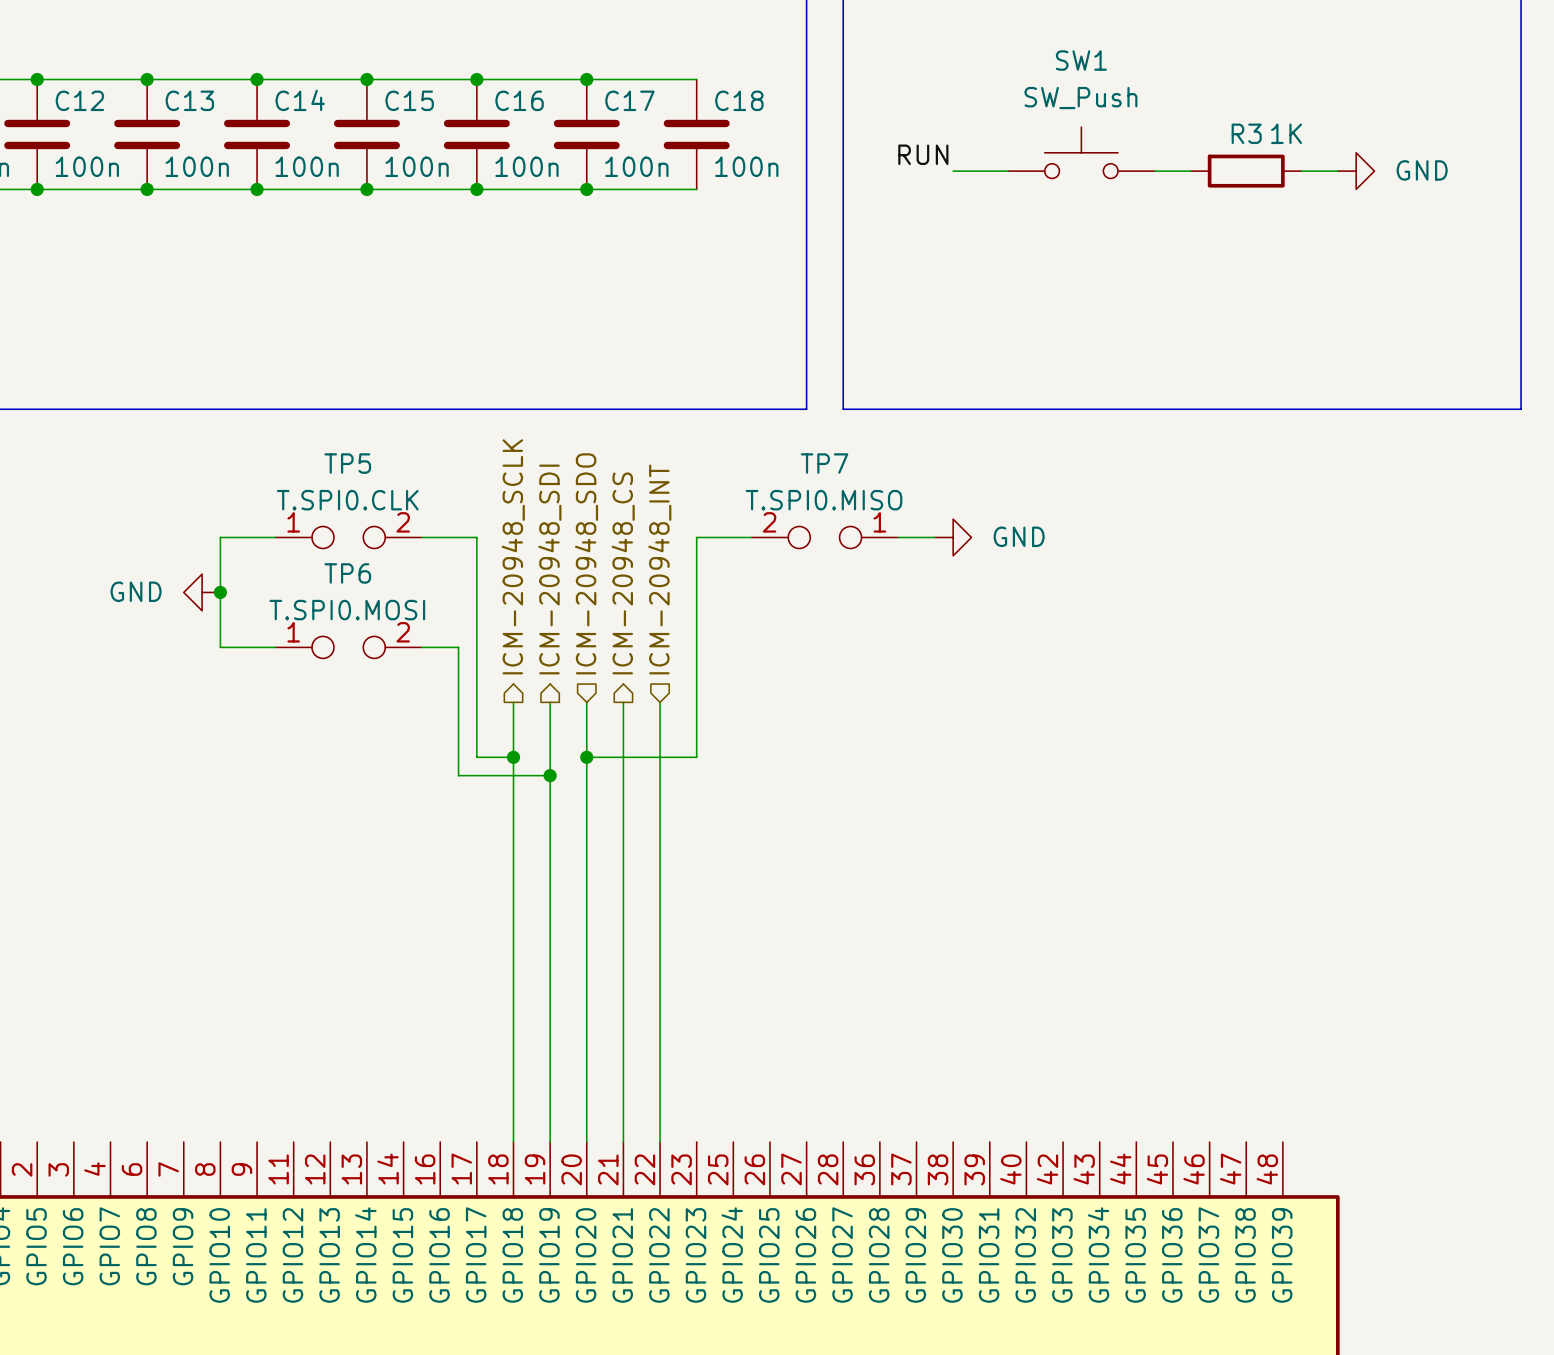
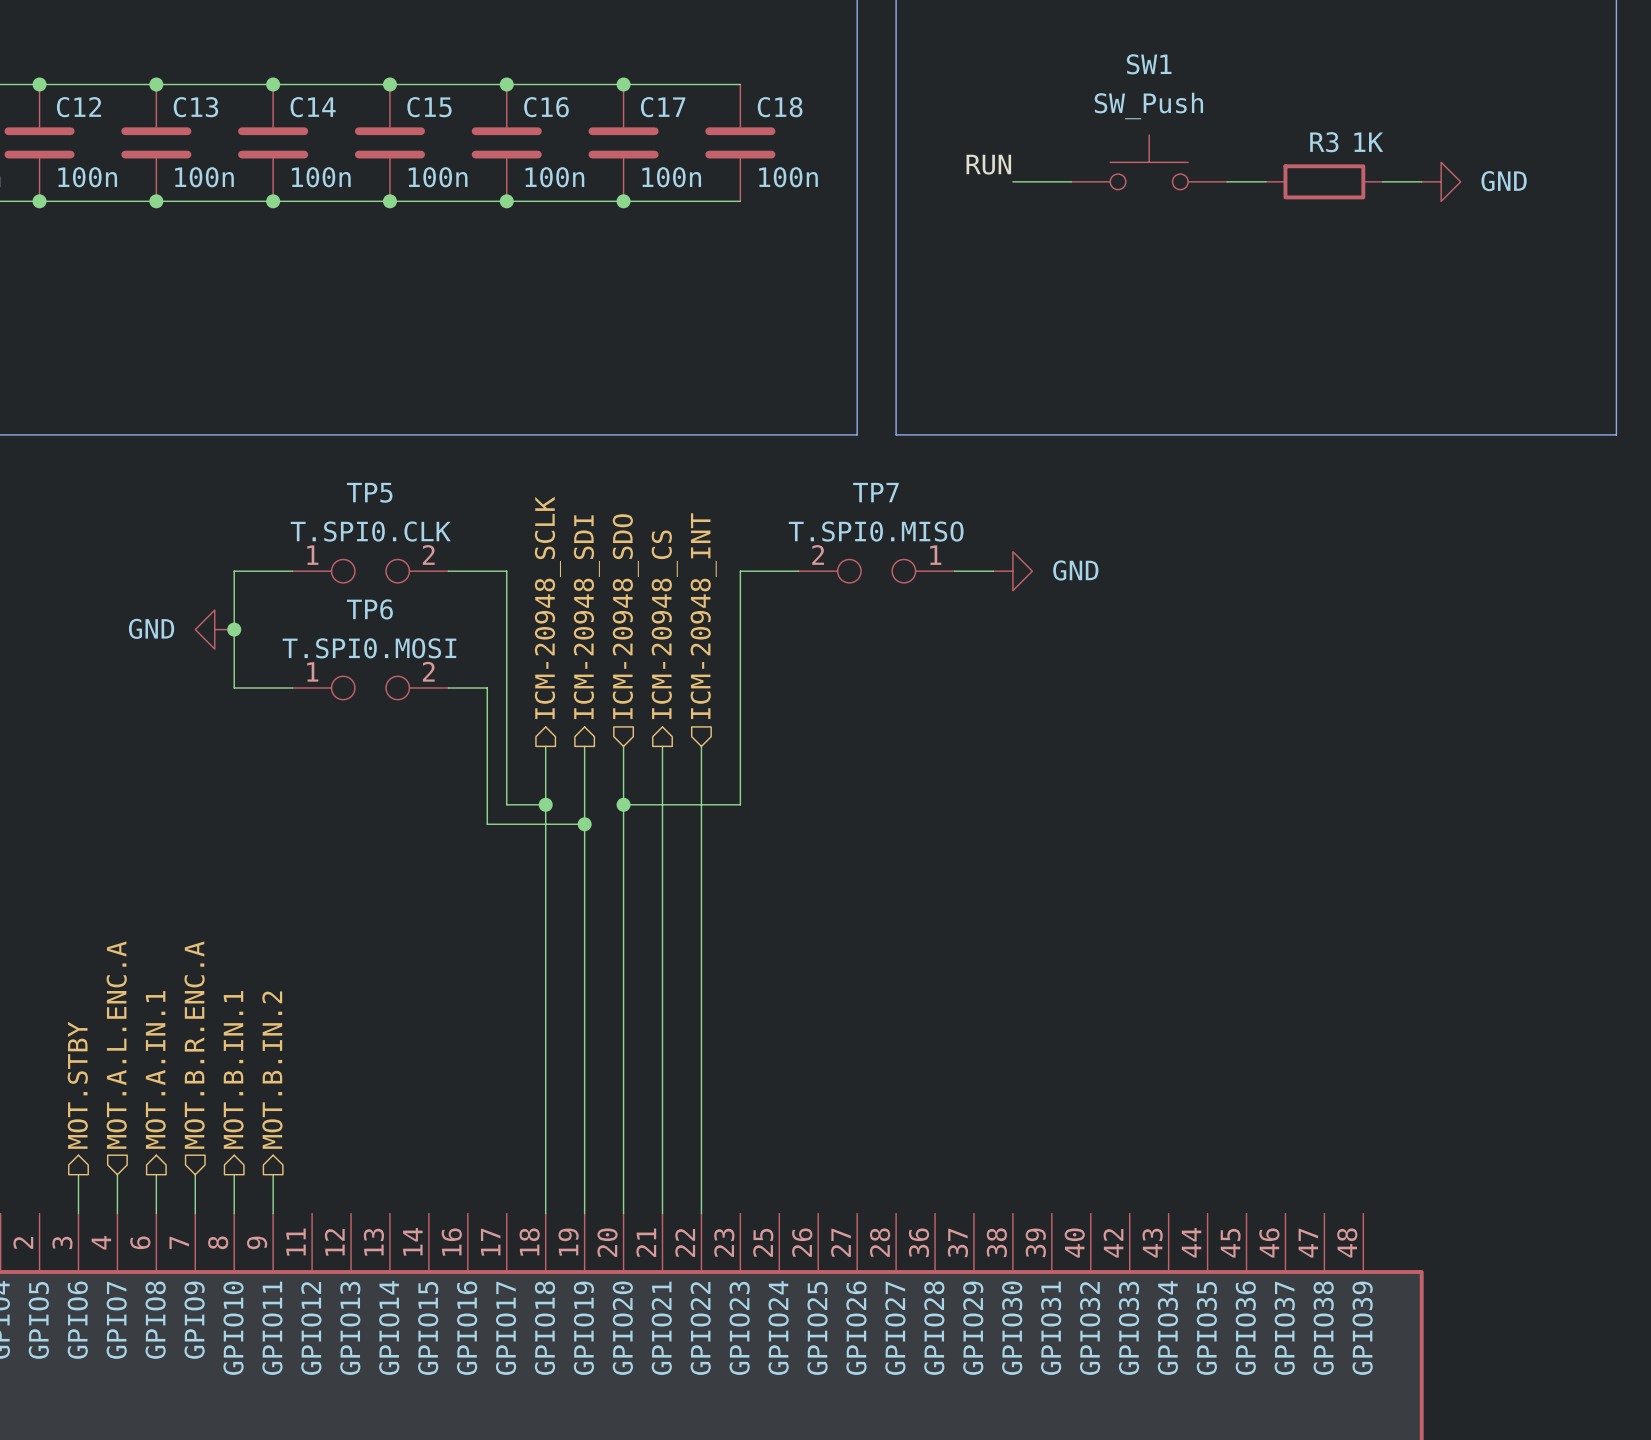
hierarchical label: none -> MOT.B.R.ENC.A (194, 1045)
hierarchical label: none -> MOT.A.L.ENC.A (116, 1045)
hierarchical label: none -> MOT.B.IN.1 (233, 1069)
hierarchical label: none -> MOT.B.IN.2 (272, 1070)
hierarchical label: none -> MOT.A.IN.1 (155, 1069)
hierarchical label: none -> MOT.STBY (77, 1085)
wire: none -> (78, 1174) (78, 1213)
wire: none -> (117, 1174) (117, 1213)
wire: none -> (156, 1174) (156, 1213)
wire: none -> (195, 1174) (195, 1213)
wire: none -> (234, 1174) (234, 1213)
wire: none -> (273, 1174) (273, 1213)

